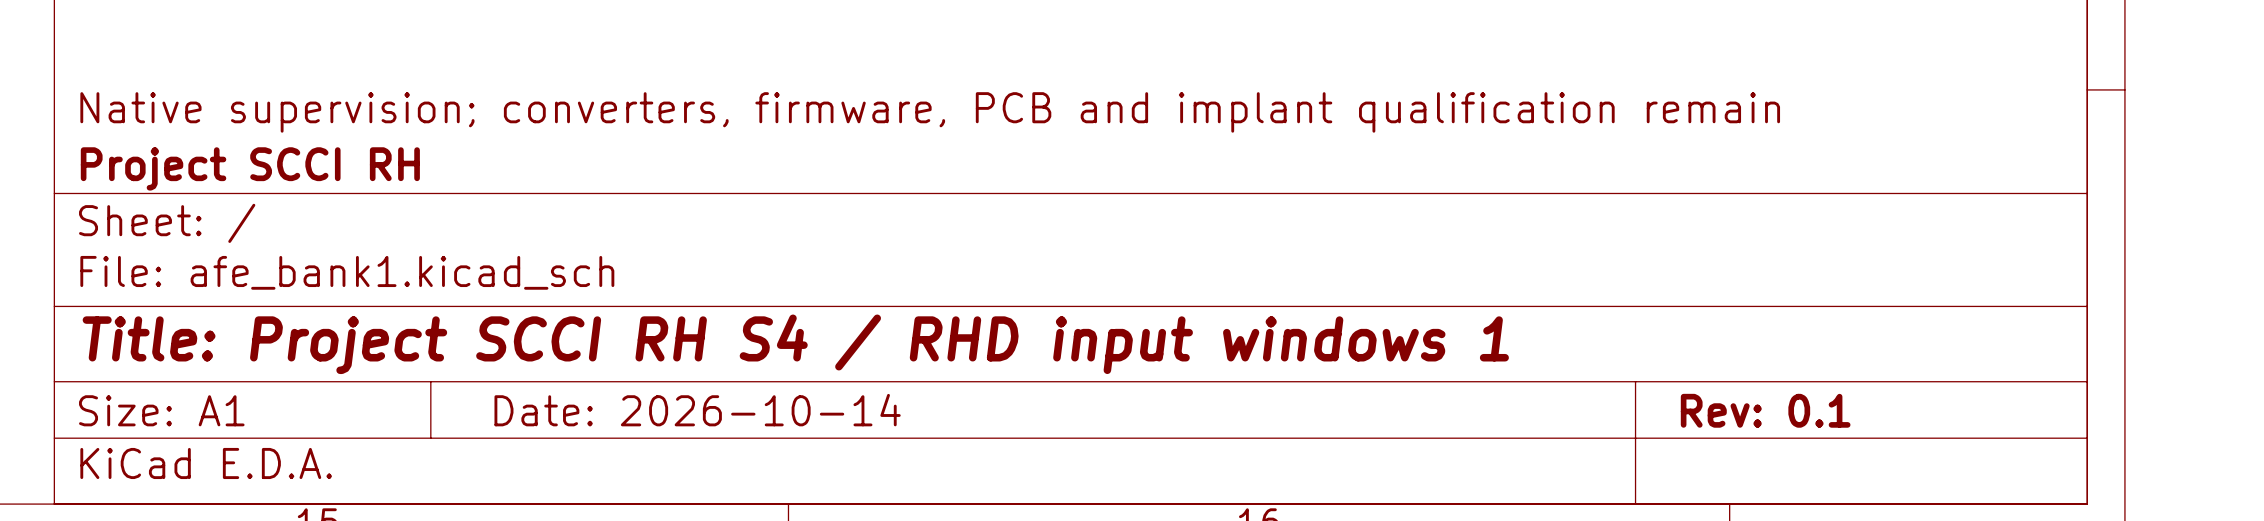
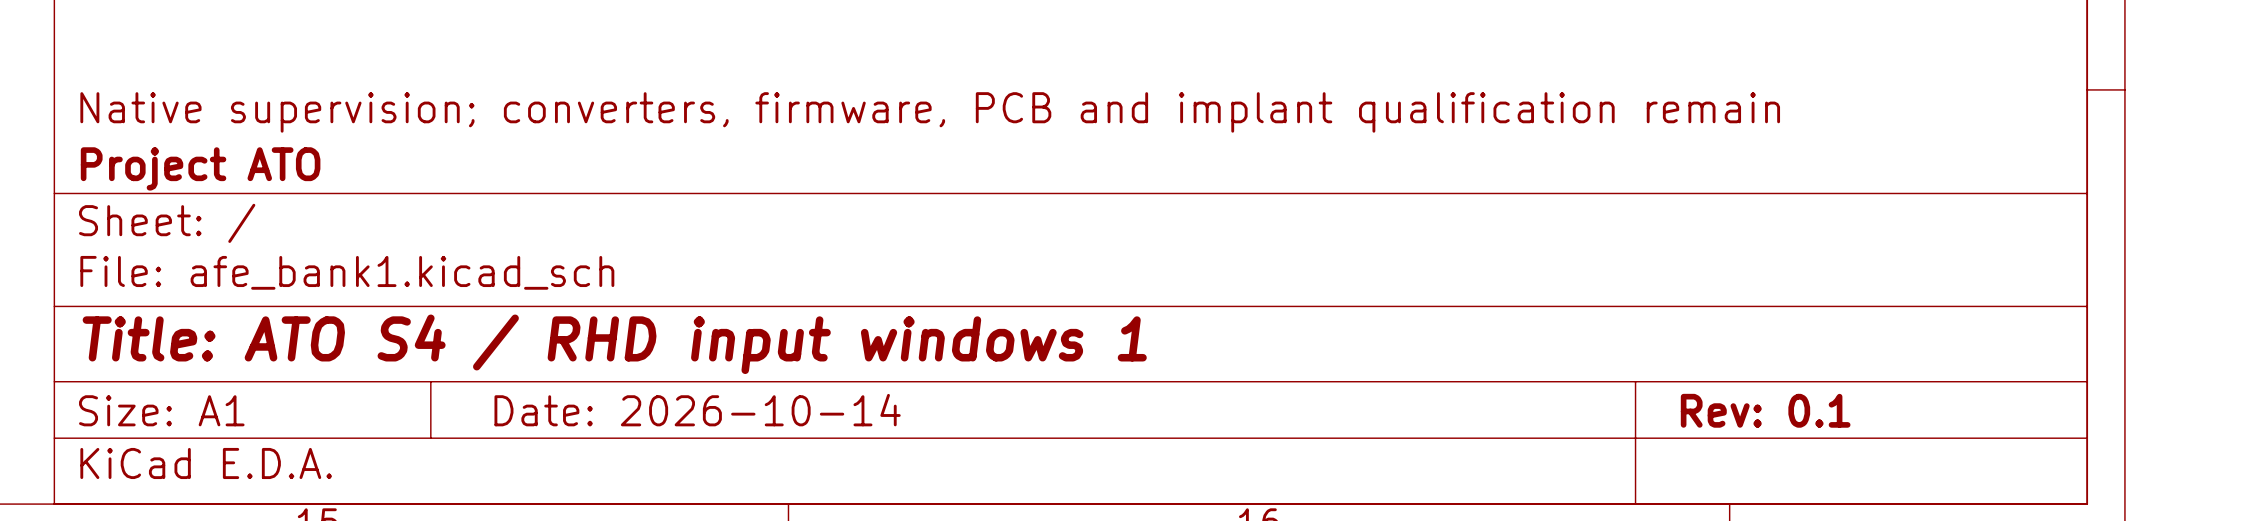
title block: Project SCCI RH (250, 168) -> Project ATO (200, 168)
title block: Title: Project SCCI RH S4 / RHD input windows 1 (795, 344) -> Title: ATO S4 / RHD input windows 1 (614, 344)

